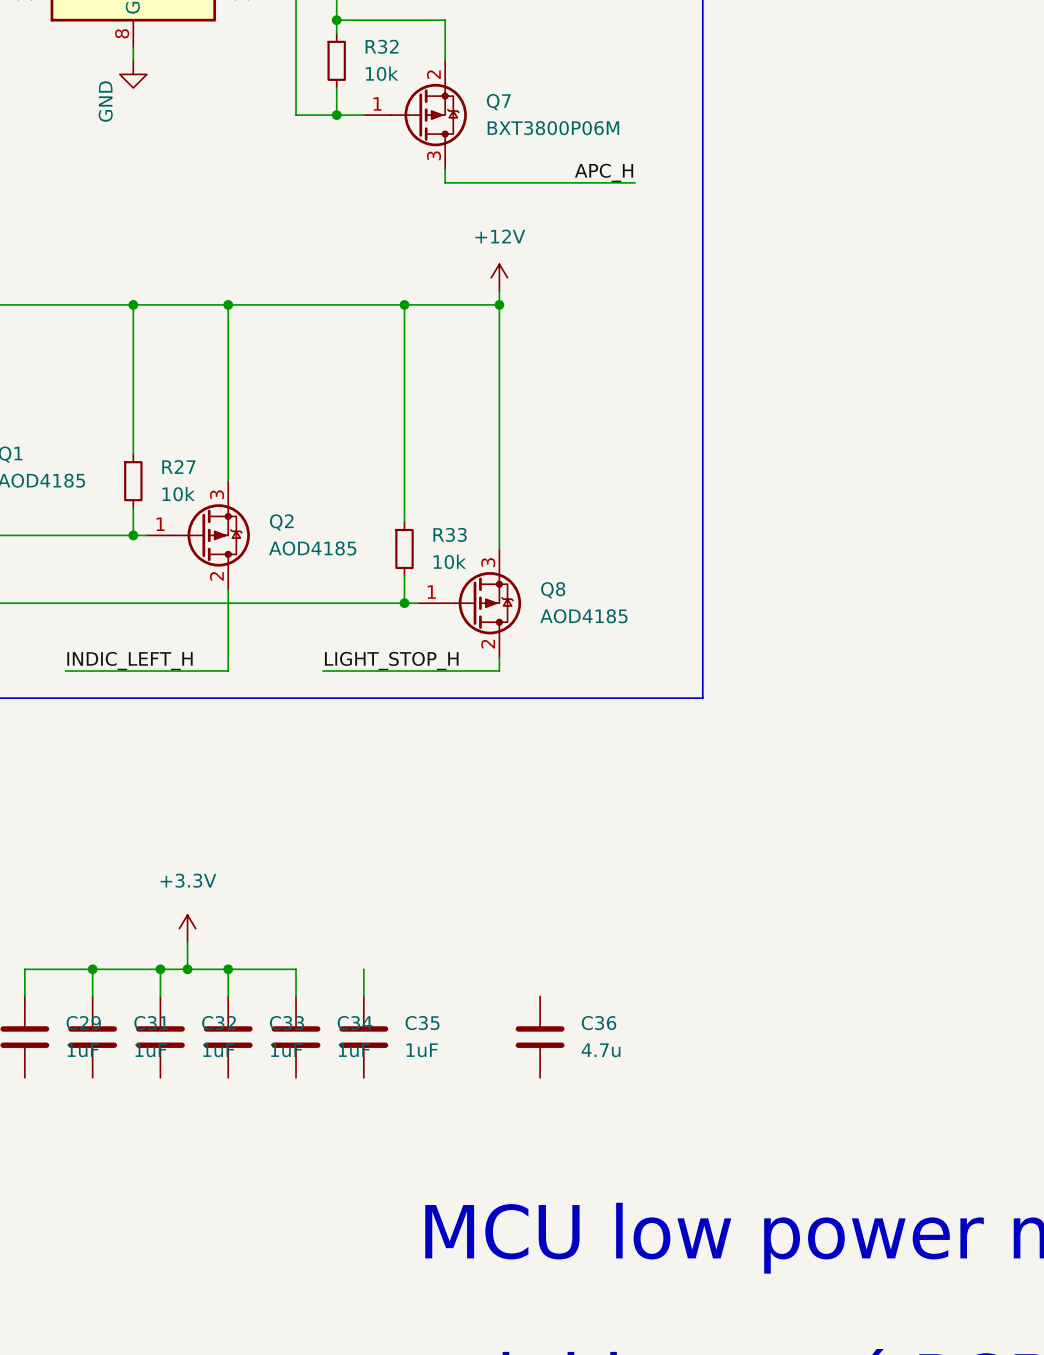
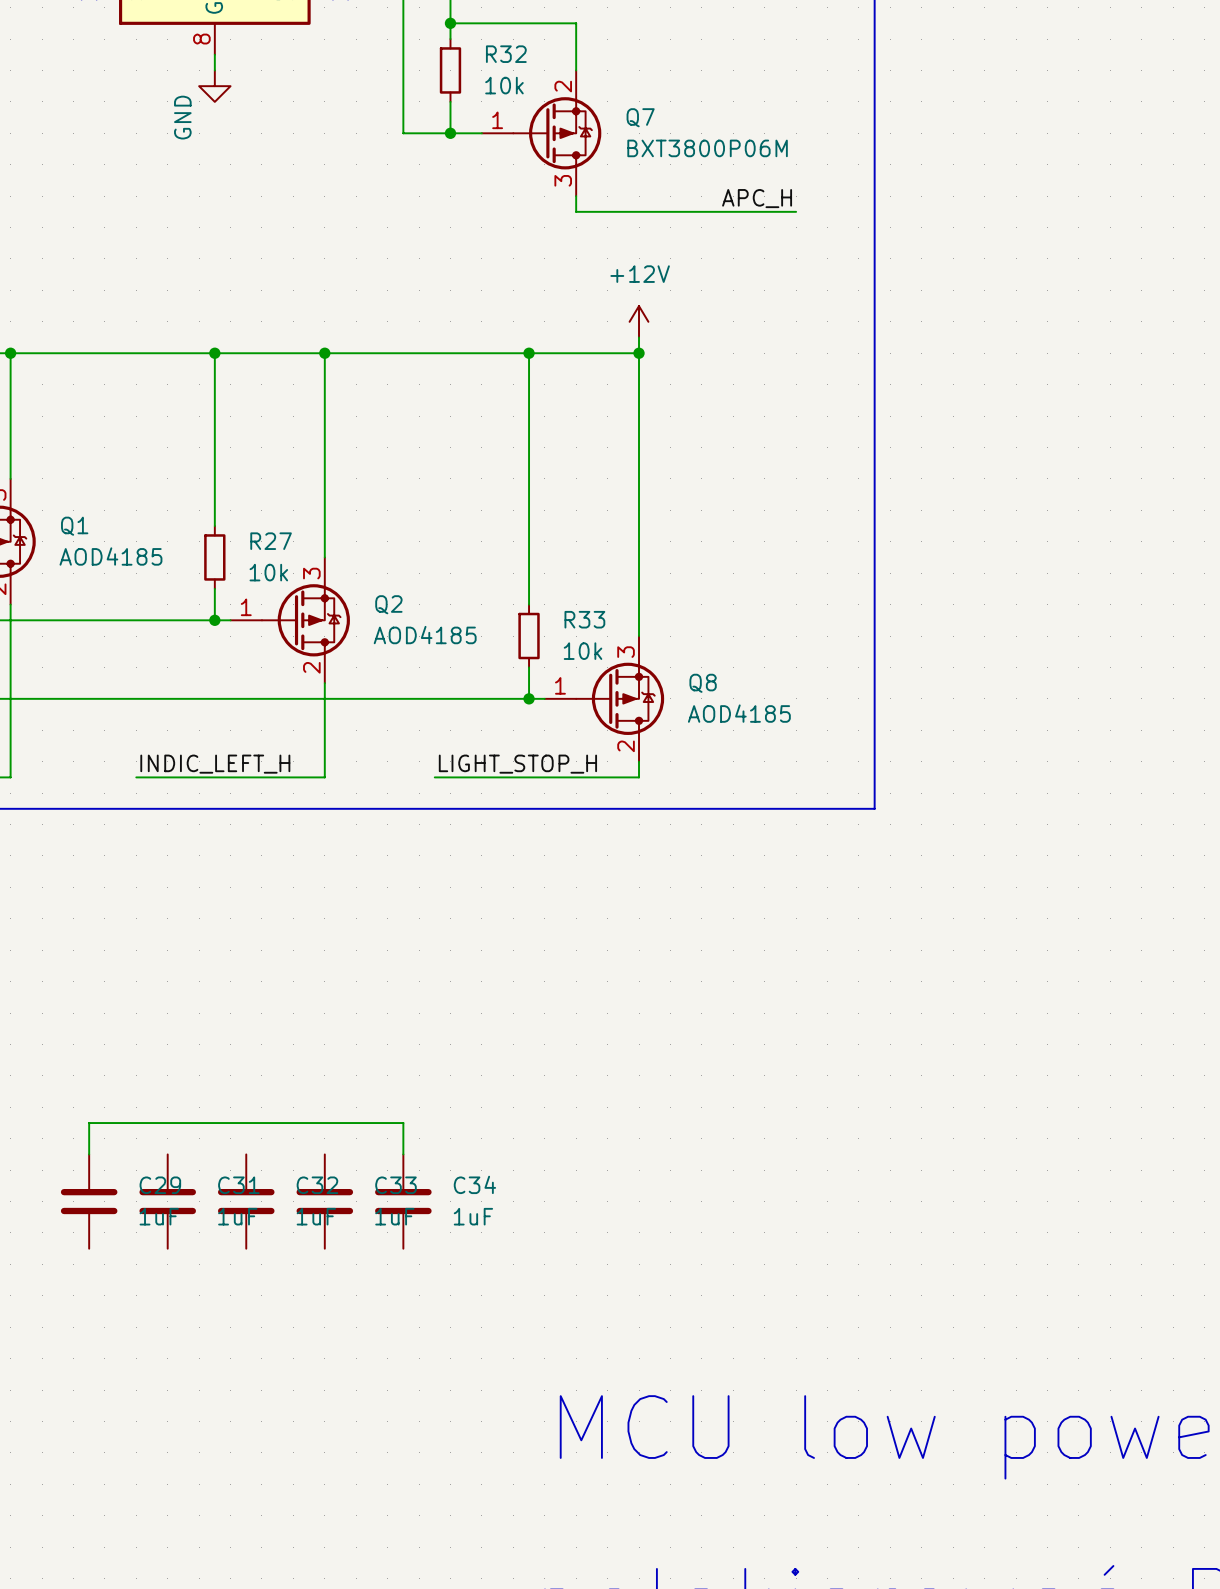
power symbol: +3.3V (187, 928) -> none
wire: (187, 942) (187, 969) -> none
wire: (92, 969) (92, 996) -> none
junction: (92, 969) -> none
wire: (160, 969) (160, 996) -> none
junction: (160, 969) -> none
junction: (187, 969) -> none
wire: (228, 969) (228, 996) -> none
junction: (228, 969) -> none
wire: (363, 969) (363, 996) -> none
C35: 1uF (363, 1037) -> none
C36: 4.7u (540, 1037) -> none

